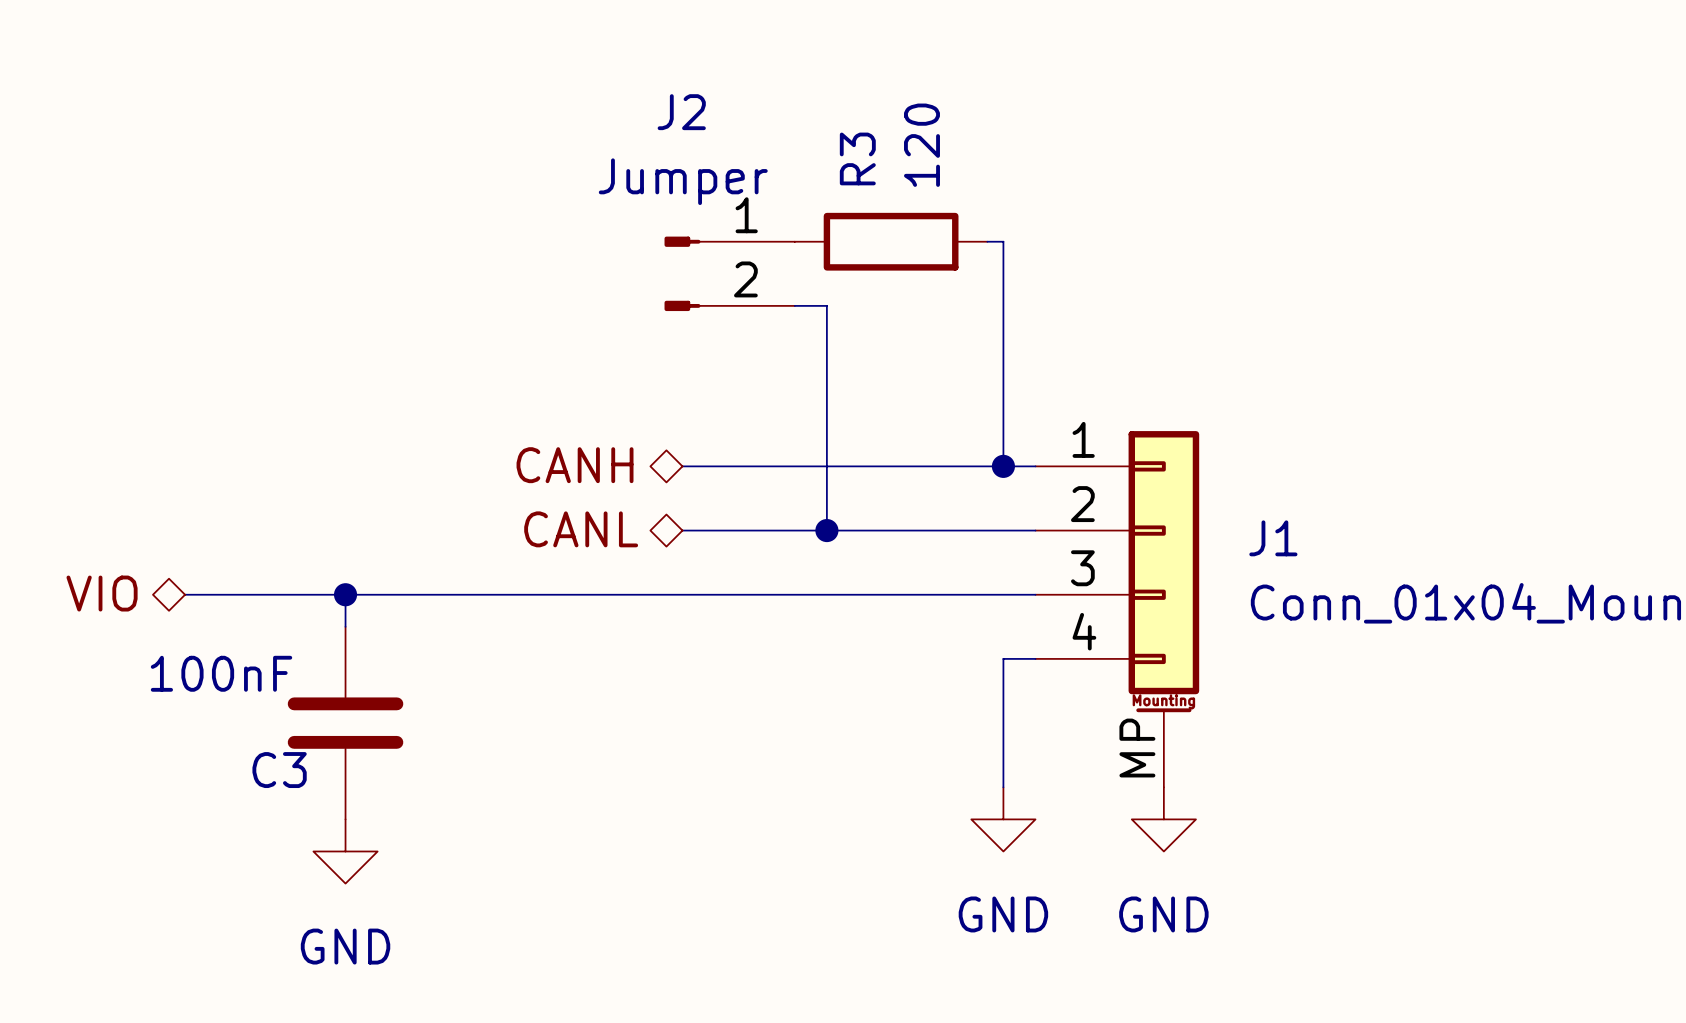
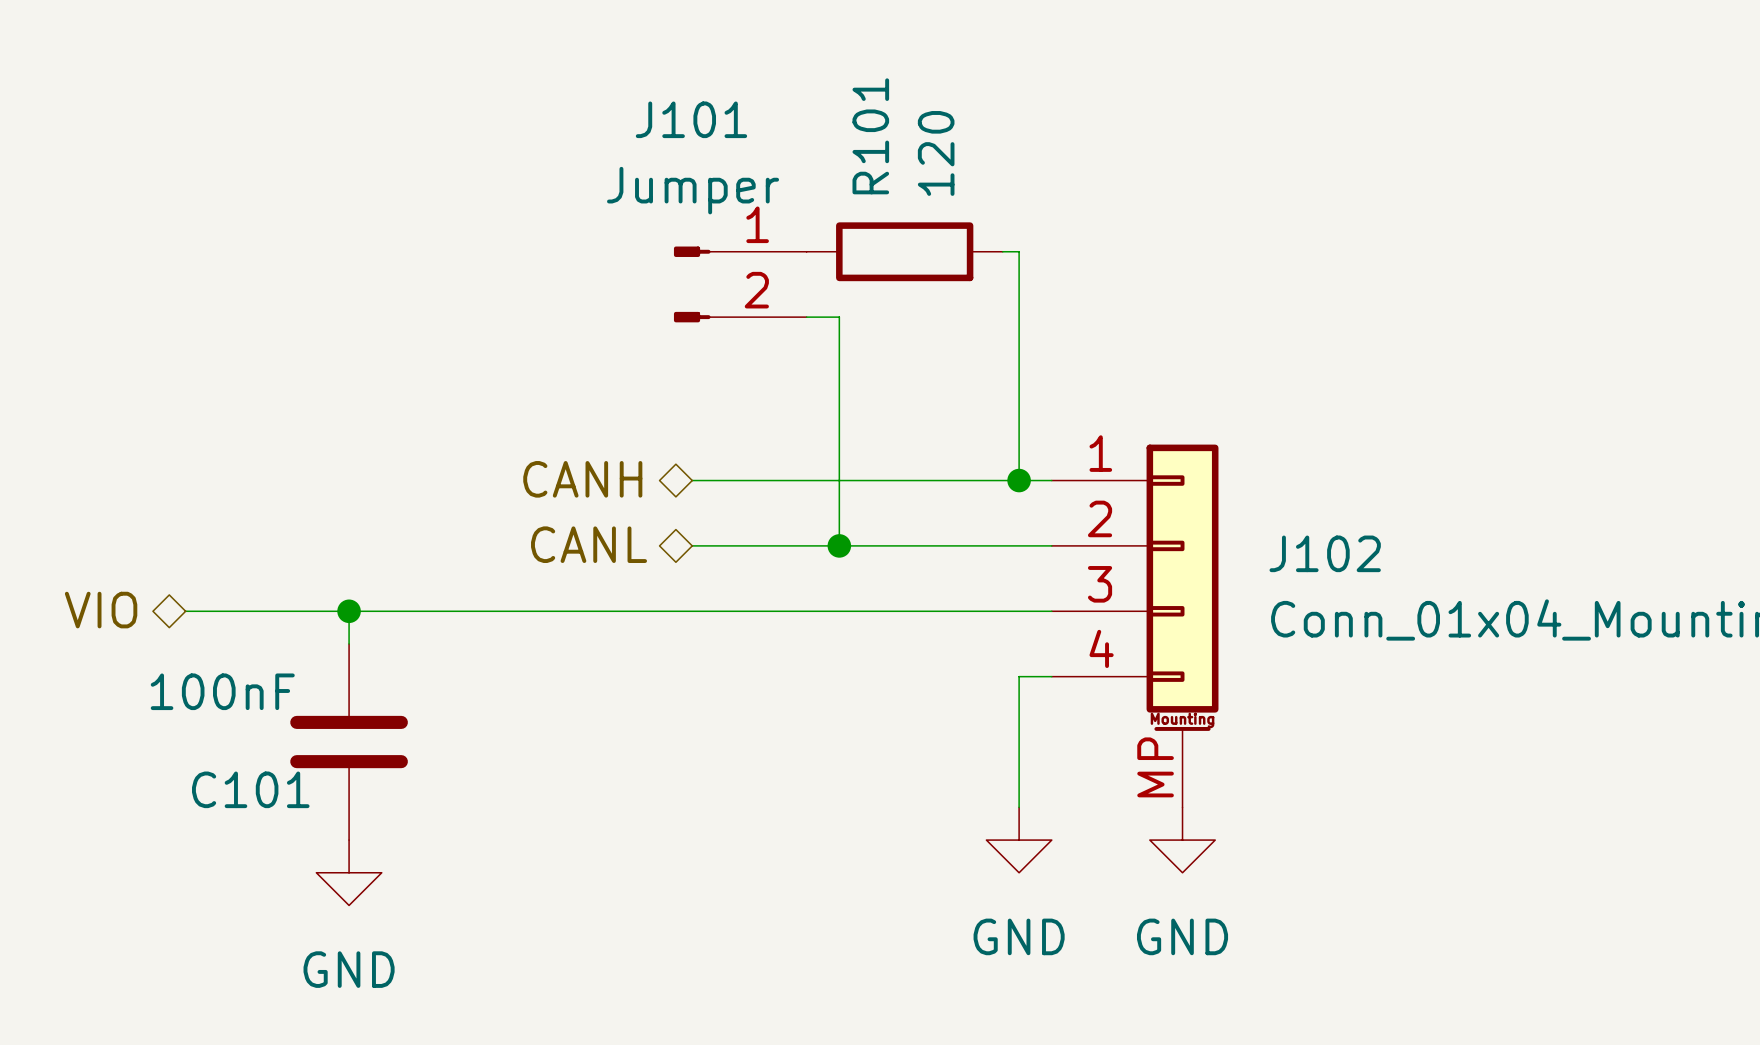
J2 name: J2 (681, 112) -> J101 (691, 119)
R3 name: R3 (857, 158) -> R101 (870, 136)
J1 name: J1 (1273, 538) -> J102 (1325, 553)
C3 name: C3 (279, 770) -> C101 (250, 789)

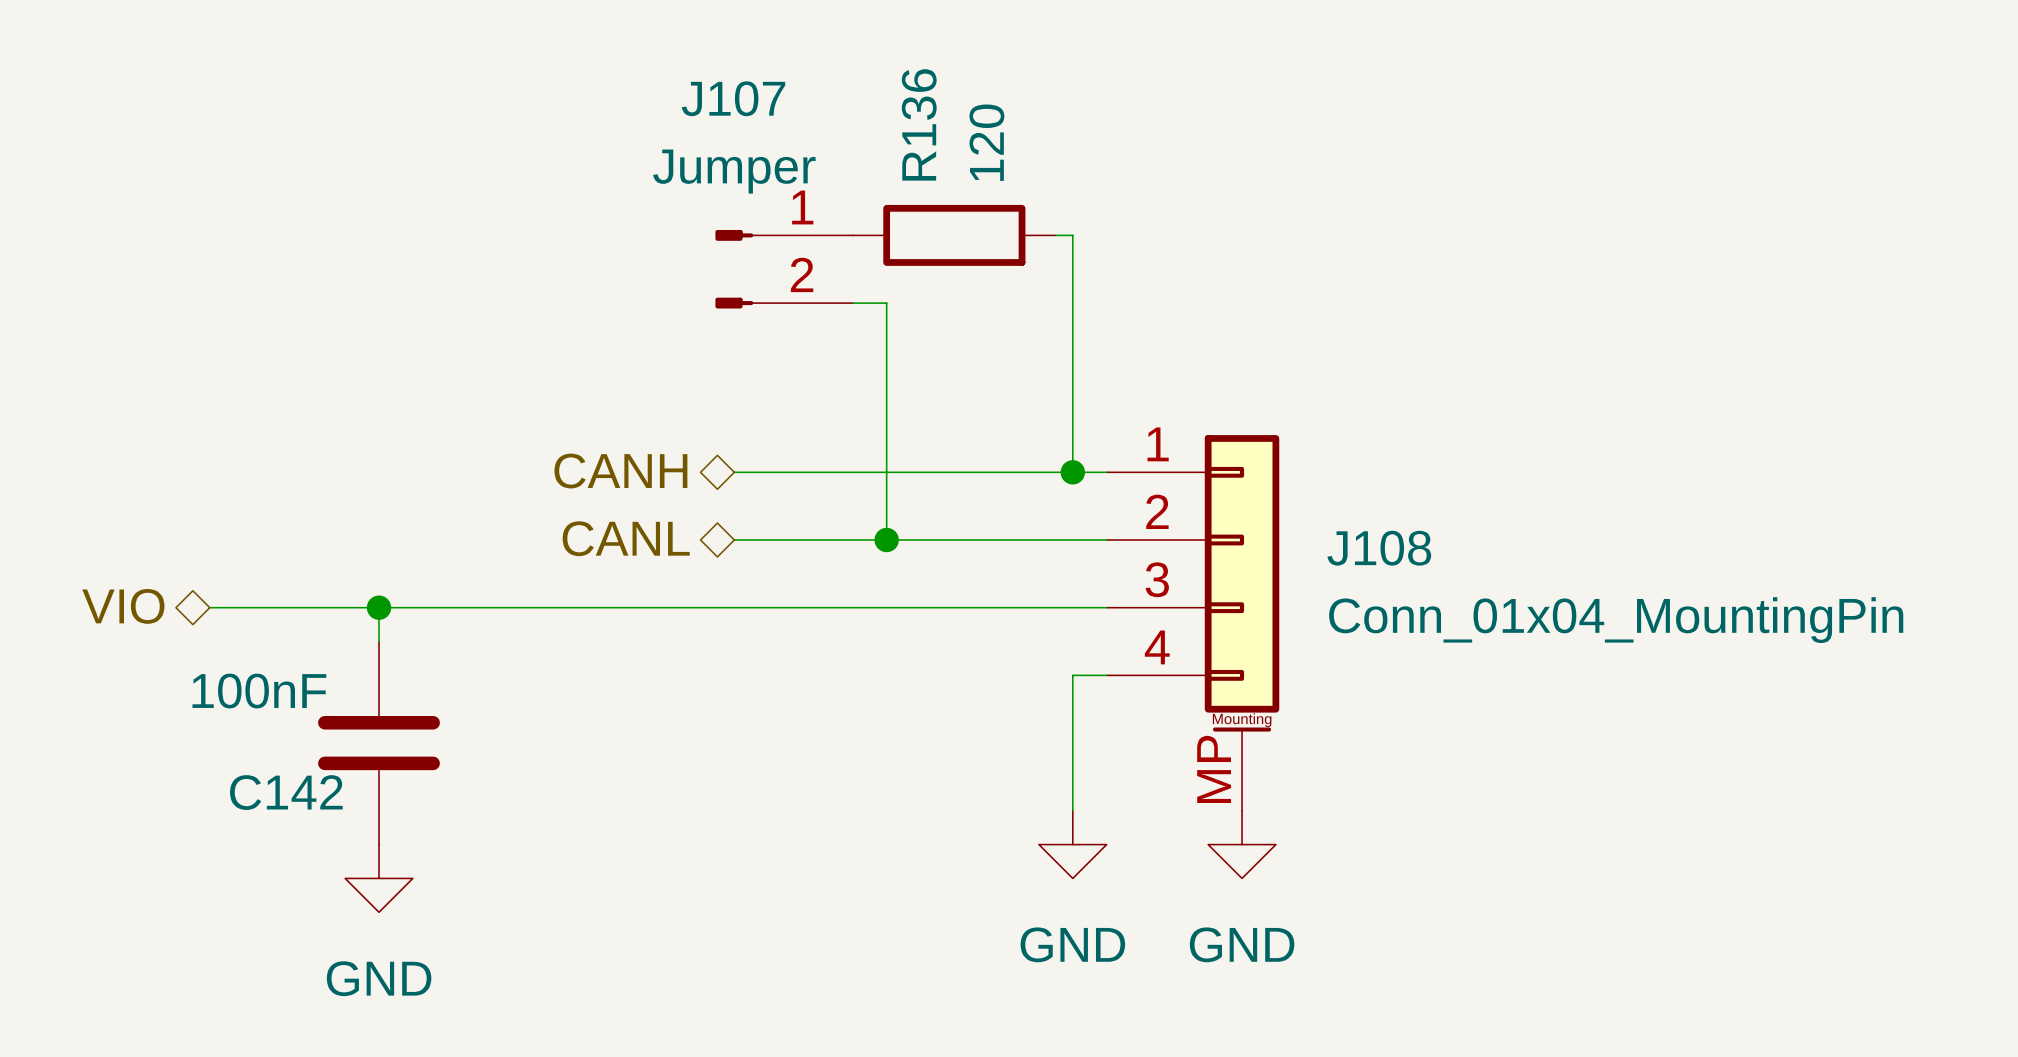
J101 name: J101 (691, 119) -> J107 (733, 98)
R101 name: R101 (870, 136) -> R136 (919, 124)
J102 name: J102 (1325, 553) -> J108 (1379, 548)
C101 name: C101 (250, 789) -> C142 (286, 792)

